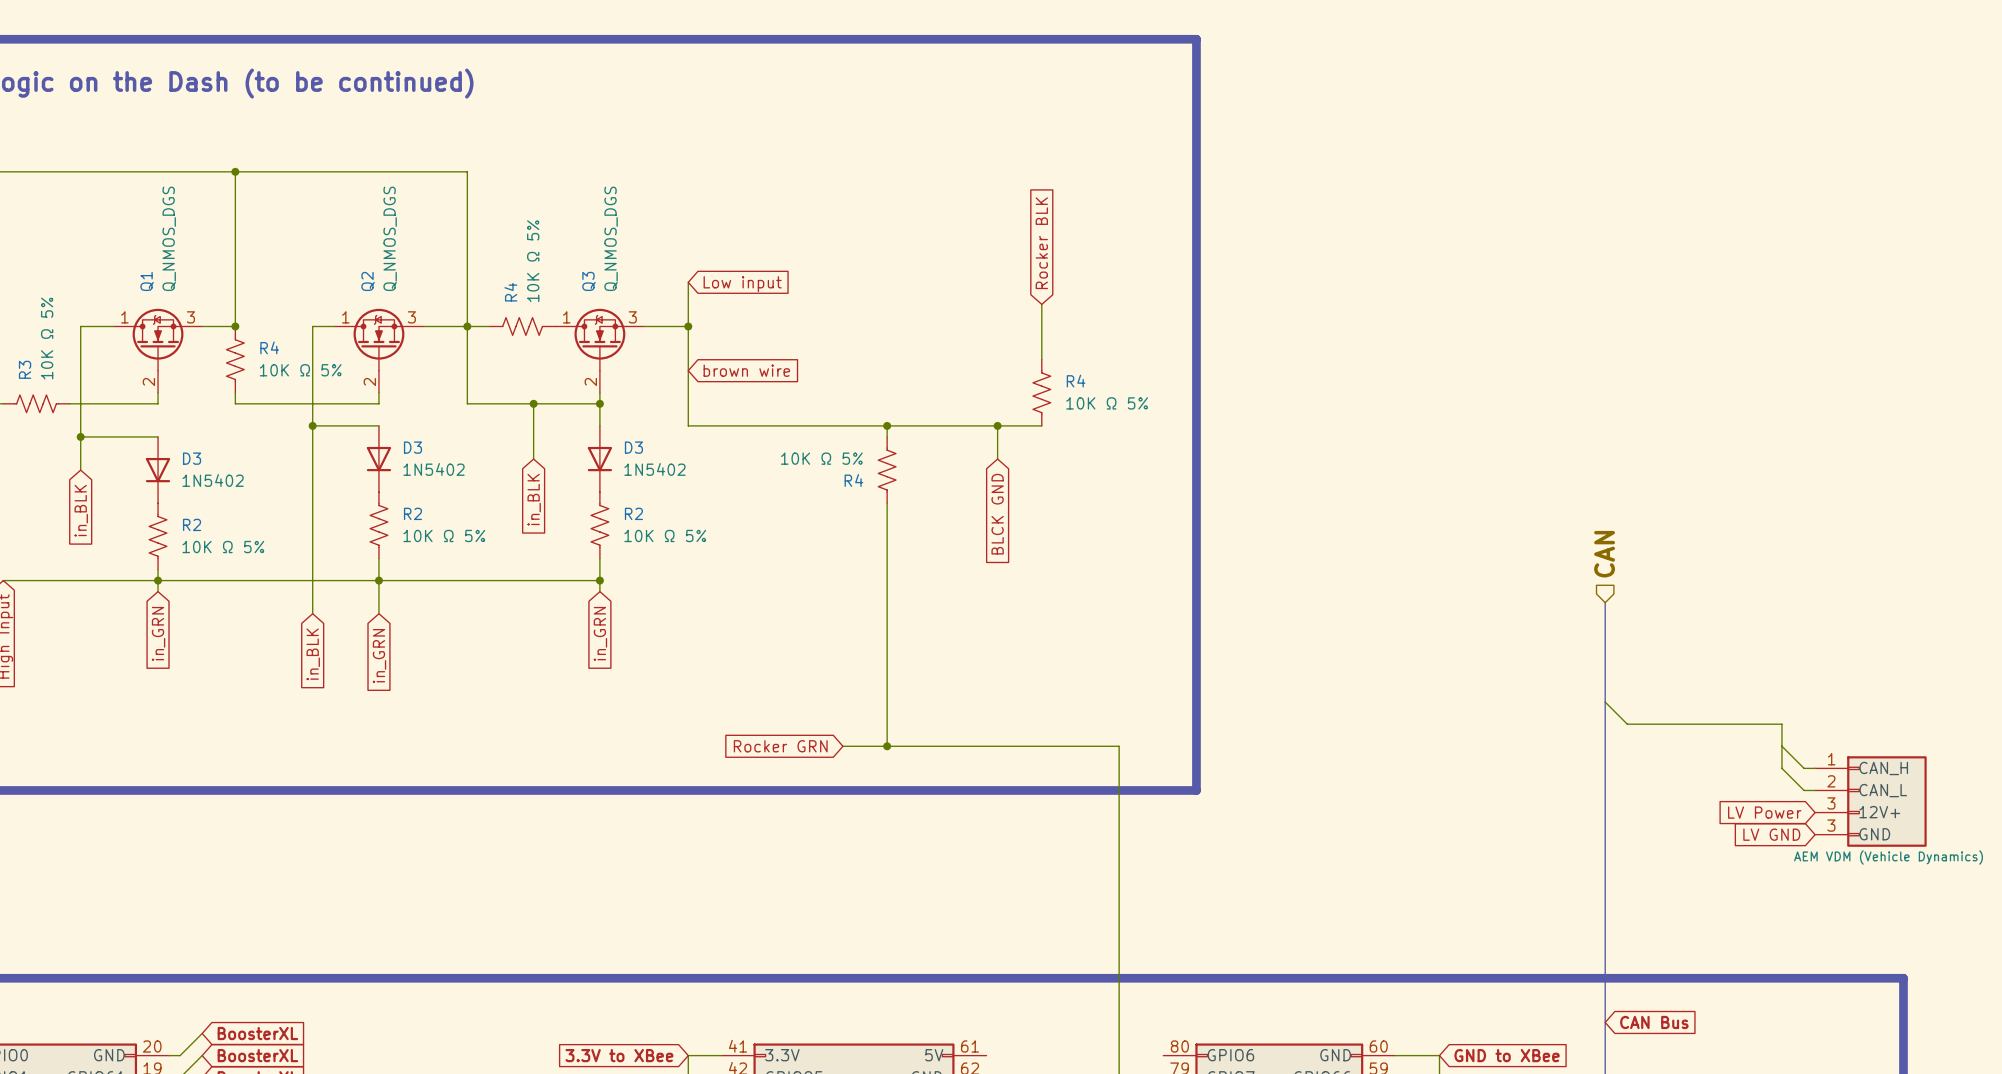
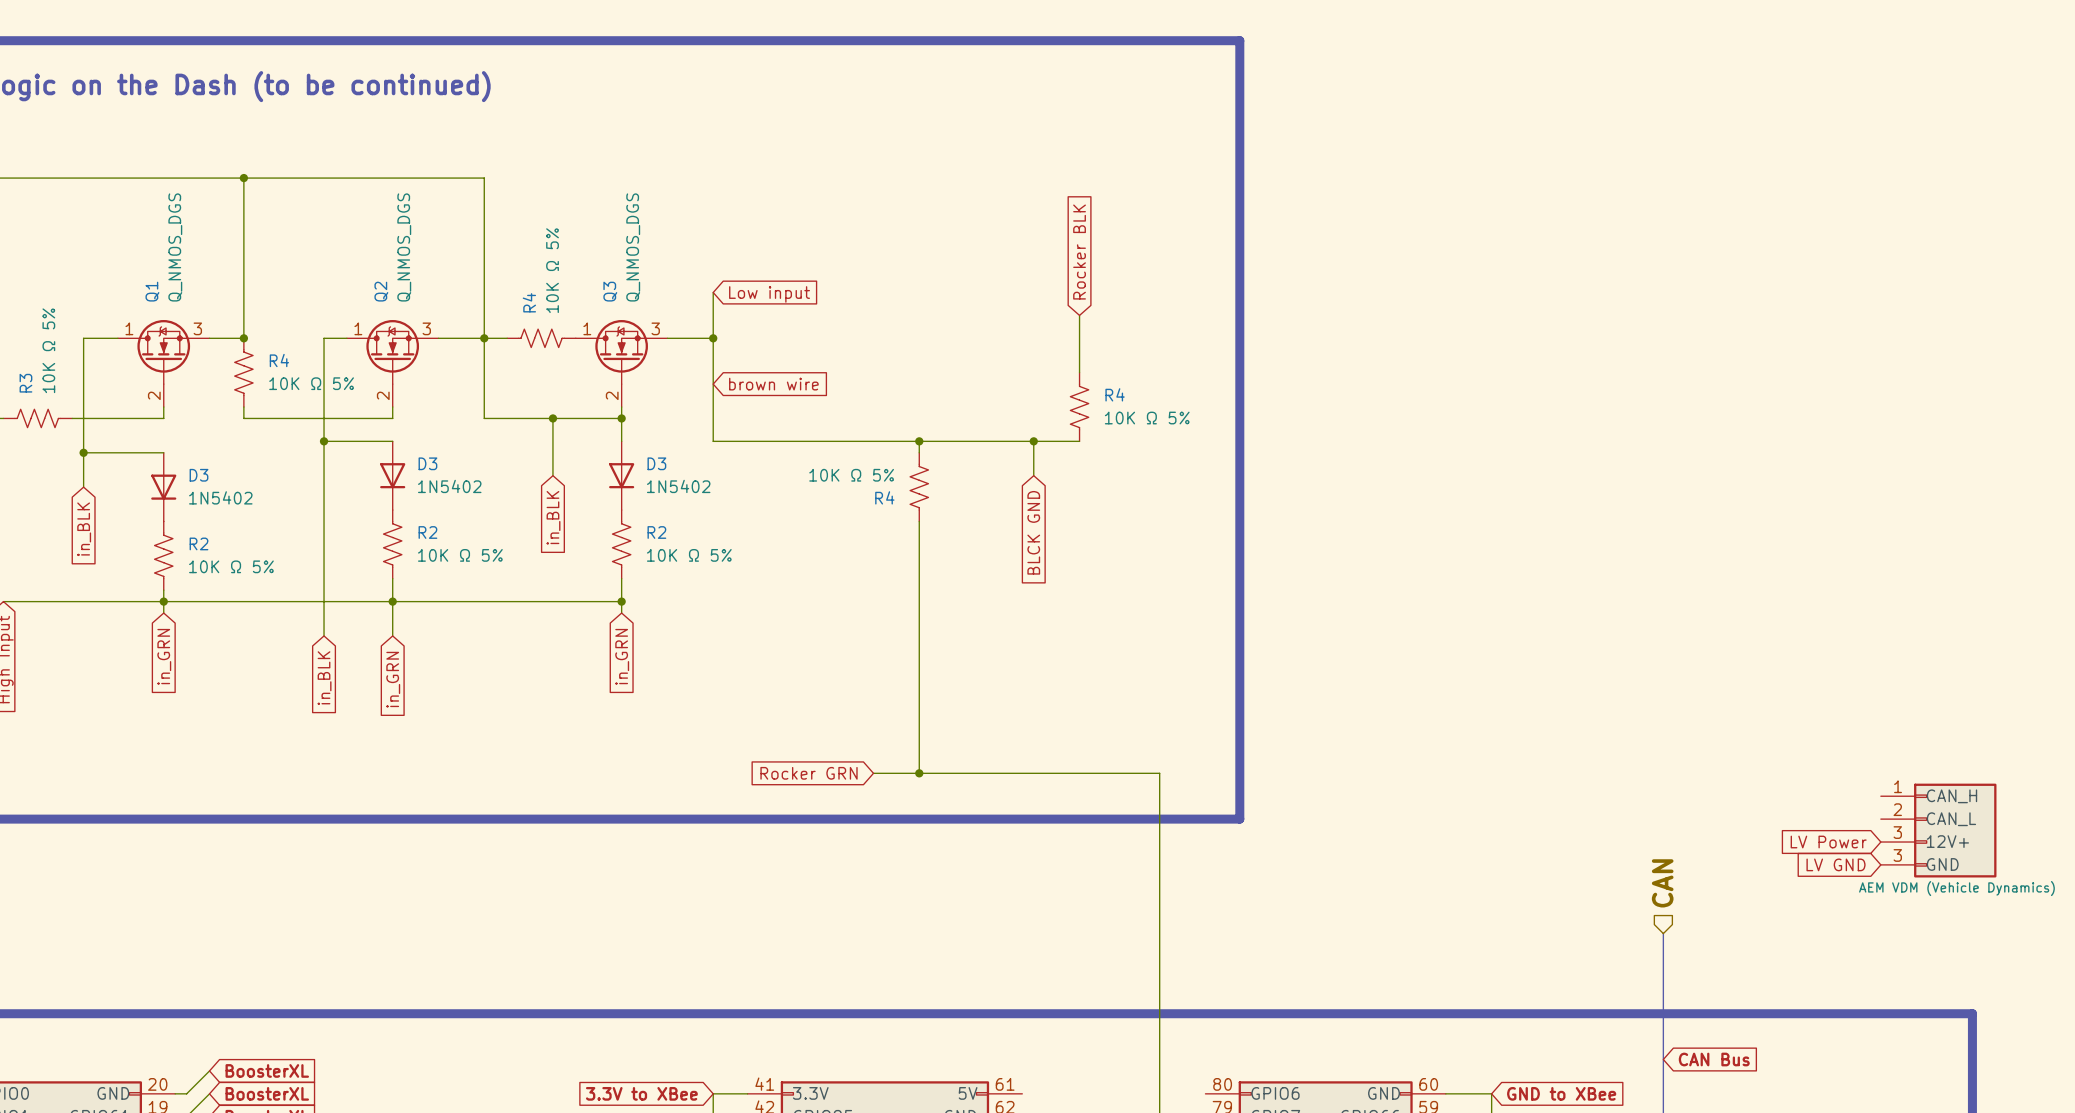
hierarchical label: CAN (1604, 554) -> none
bus: (1605, 602) (1605, 900) -> none
wire: (1605, 702) (1627, 724) (1781, 724) (1781, 768) (1804, 790) (1815, 790) -> none
wire: (1781, 746) (1804, 768) (1815, 768) -> none
hierarchical label: none -> CAN (1662, 883)

